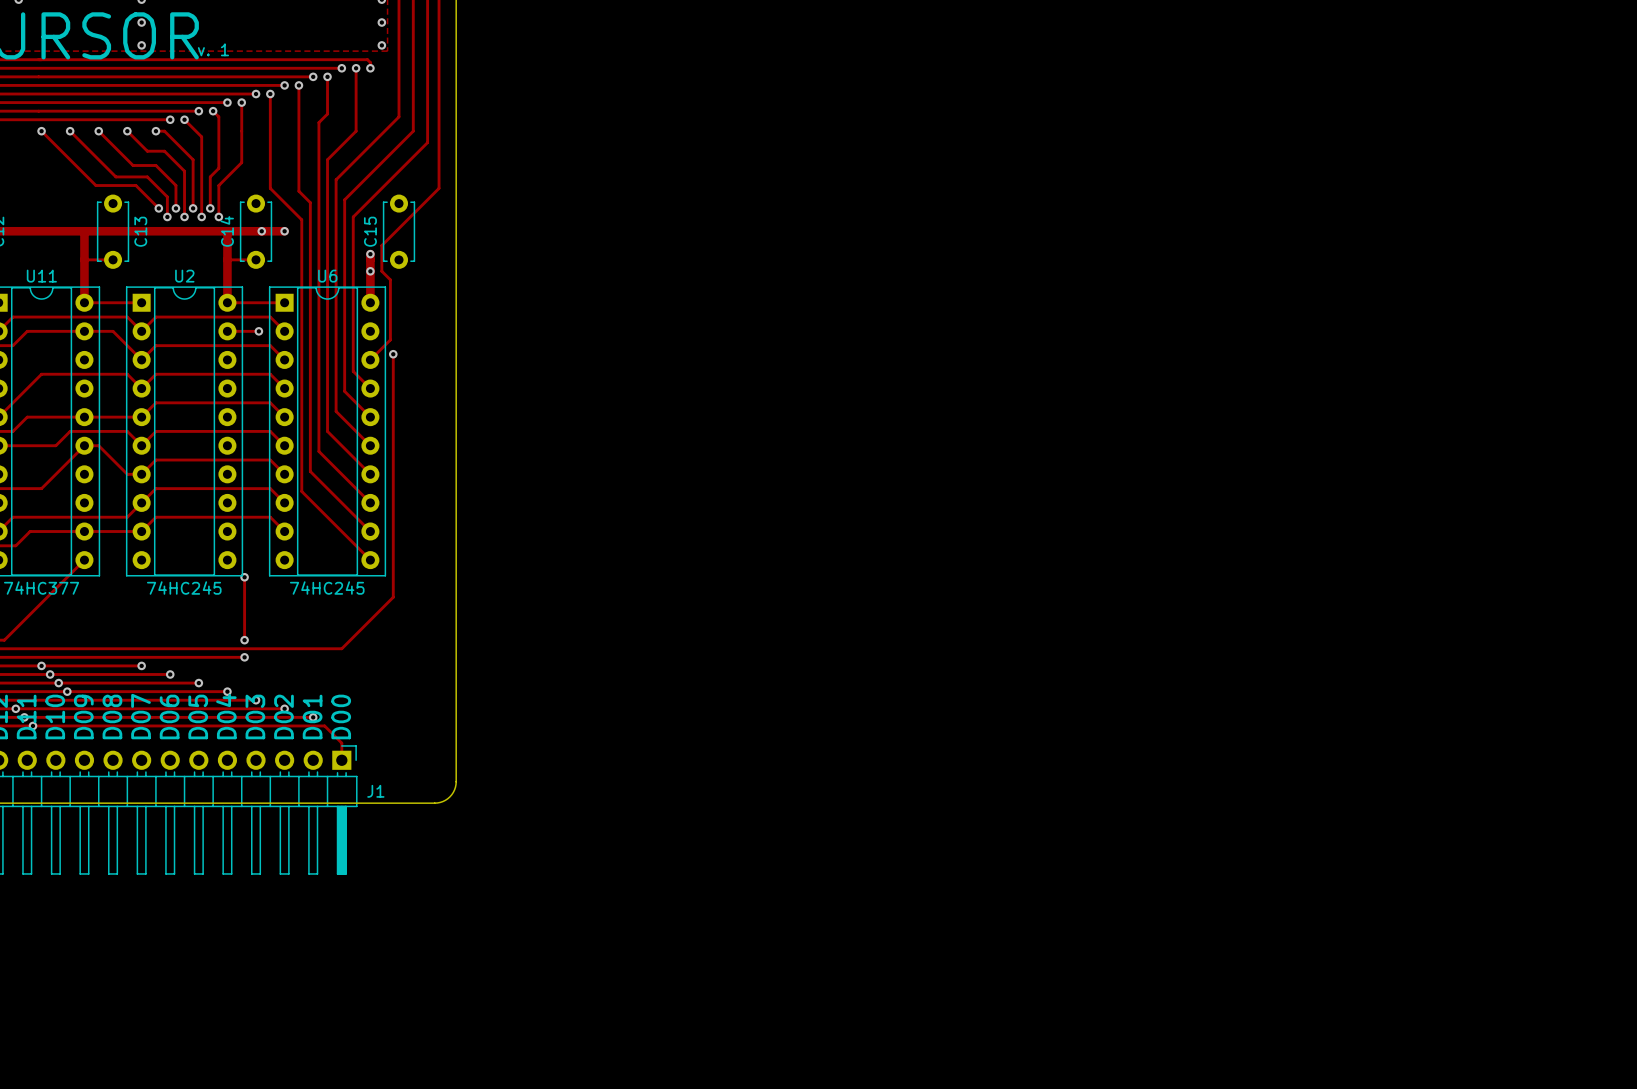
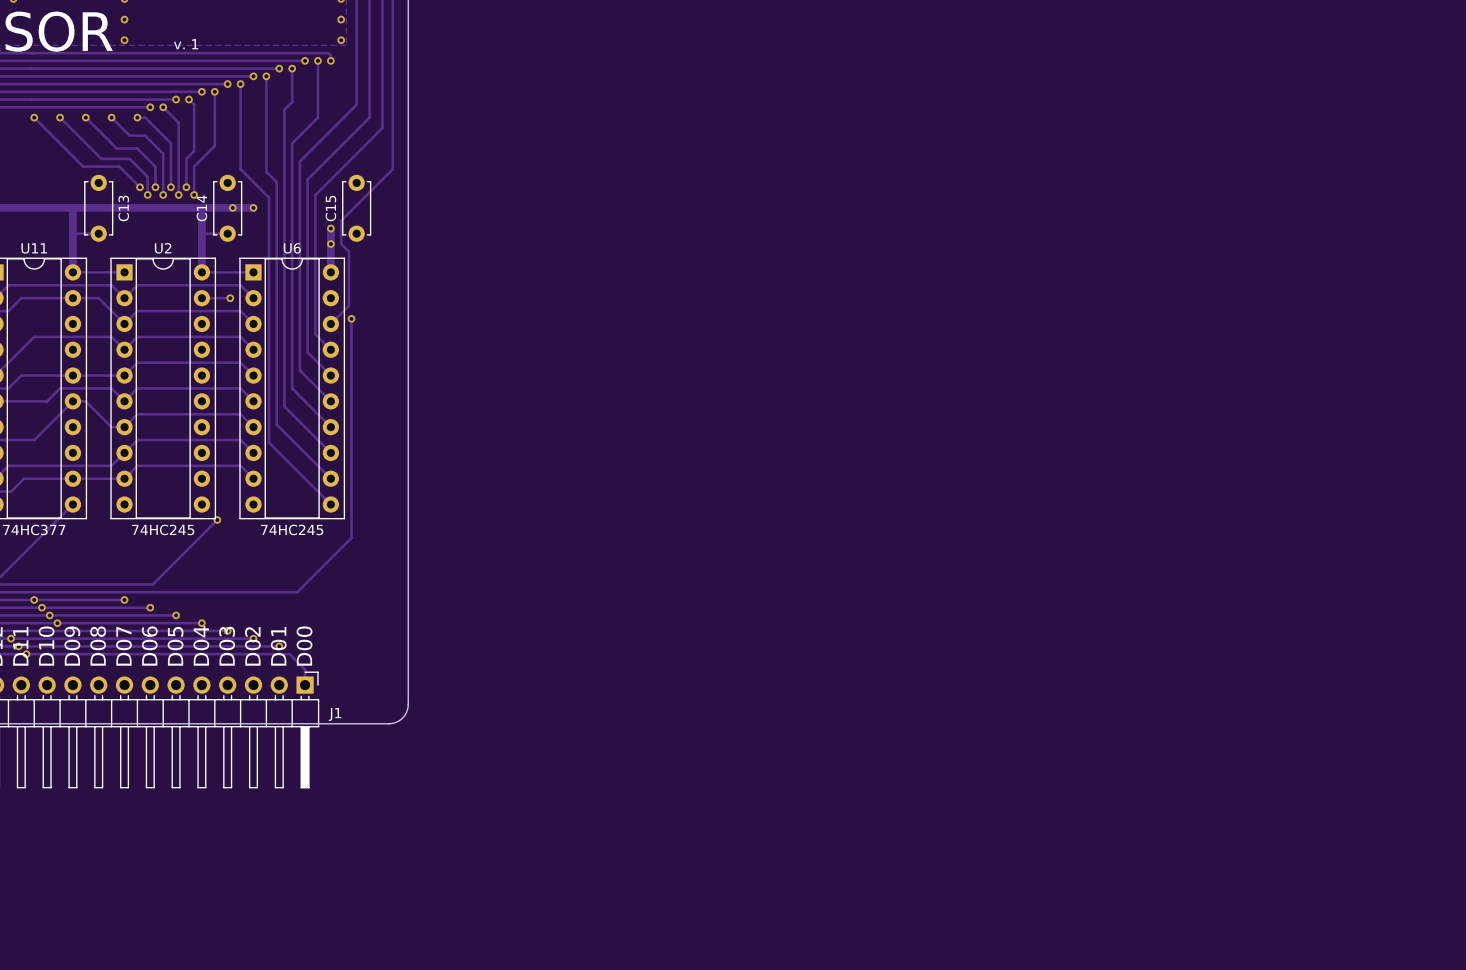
track: (244, 577) (244, 640) -> (217, 520) (152, 584)
via: (244, 640) -> none
track: (173, 648) (341, 648) -> (217, 592) (297, 592) (305, 584)
via: (244, 657) -> none

